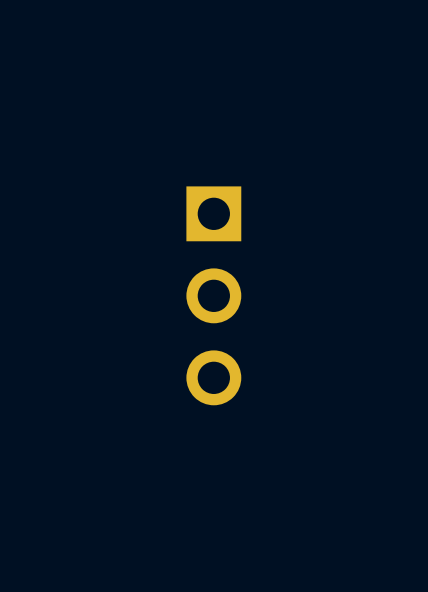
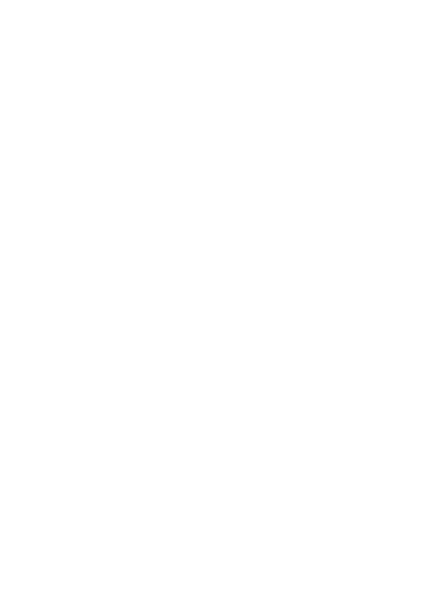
part: (213, 295) -> none

